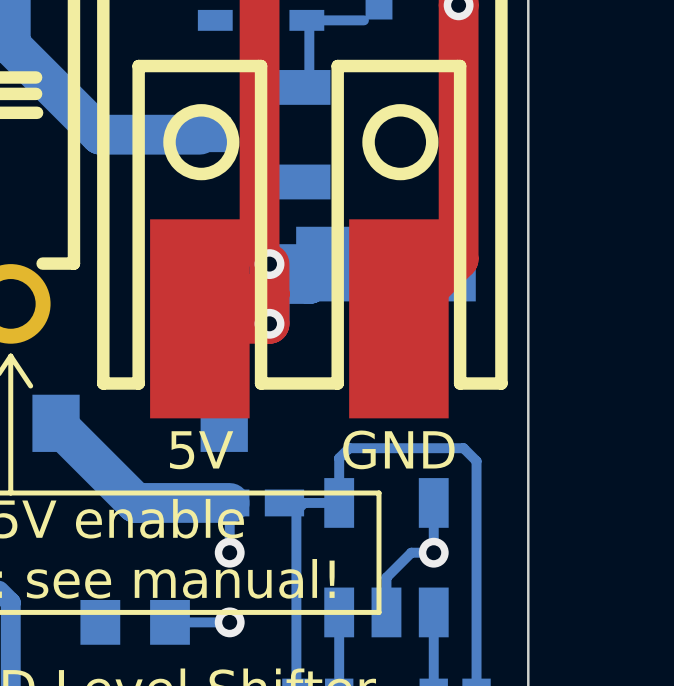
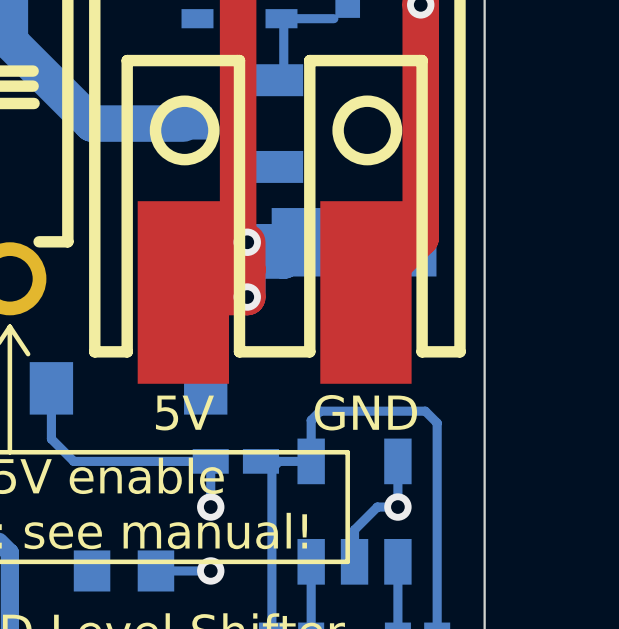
bottom track: (56, 423) (135, 502) -> (51, 388) (51, 439) (73, 461) (124, 461)
bottom track width: thick (135, 502) (229, 502) -> thin (124, 461) (210, 461)

